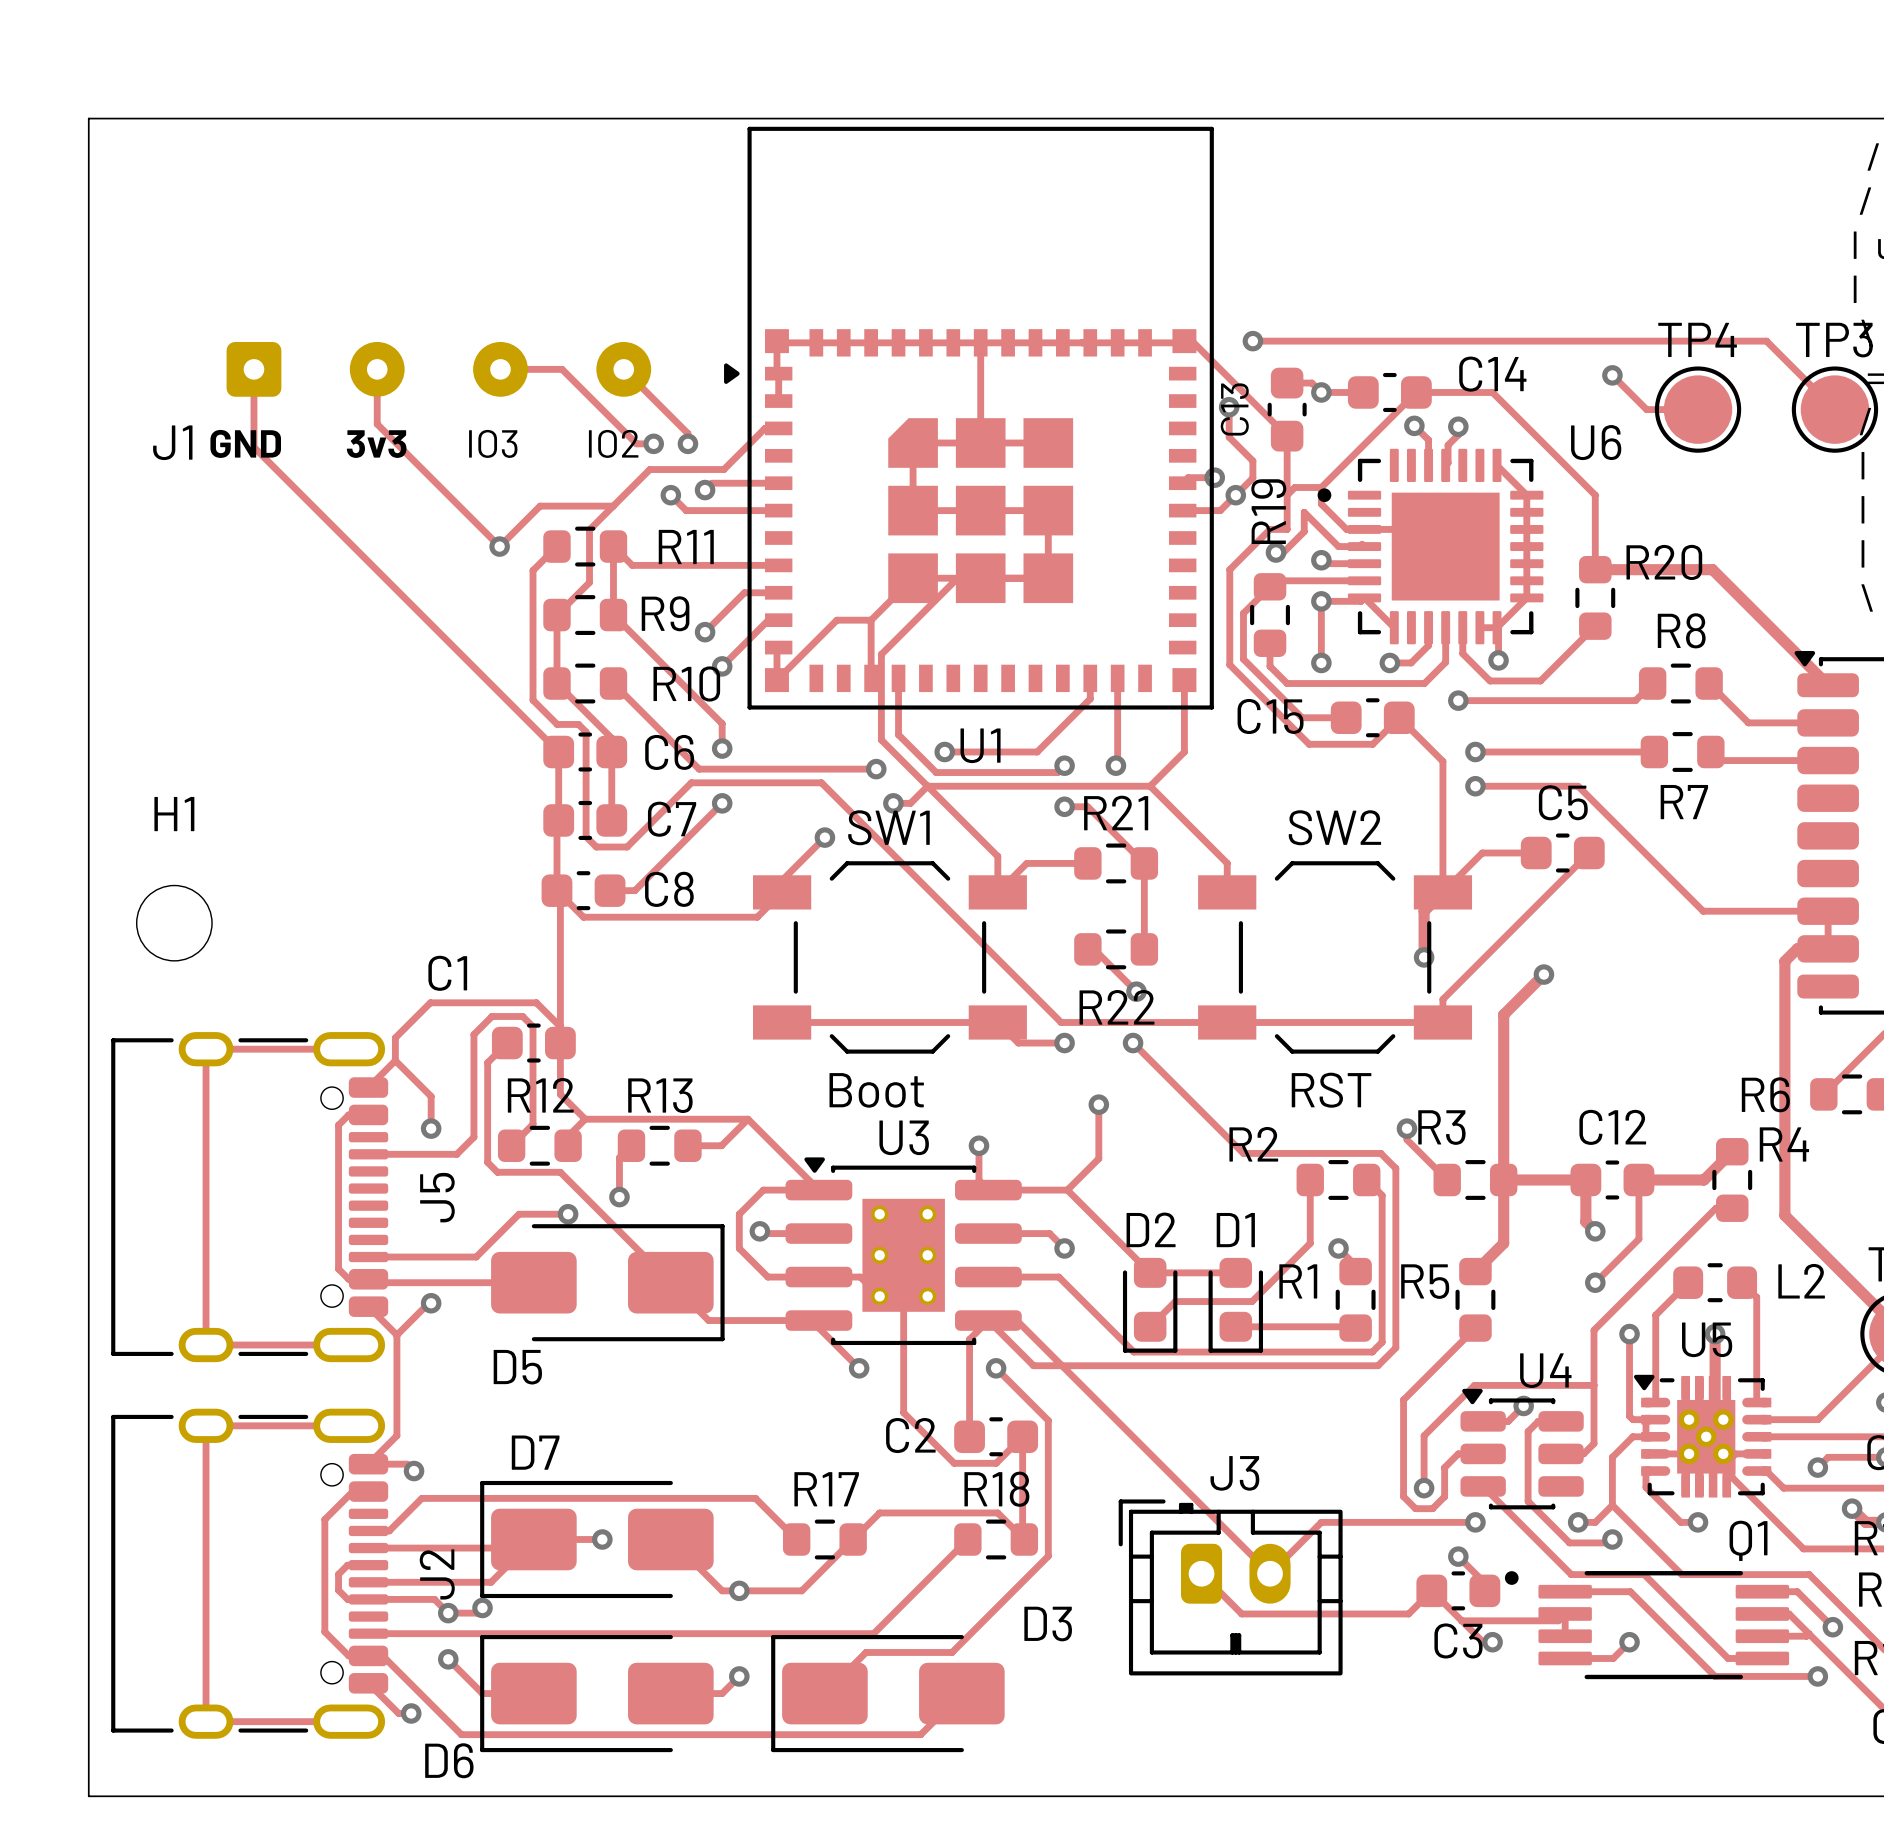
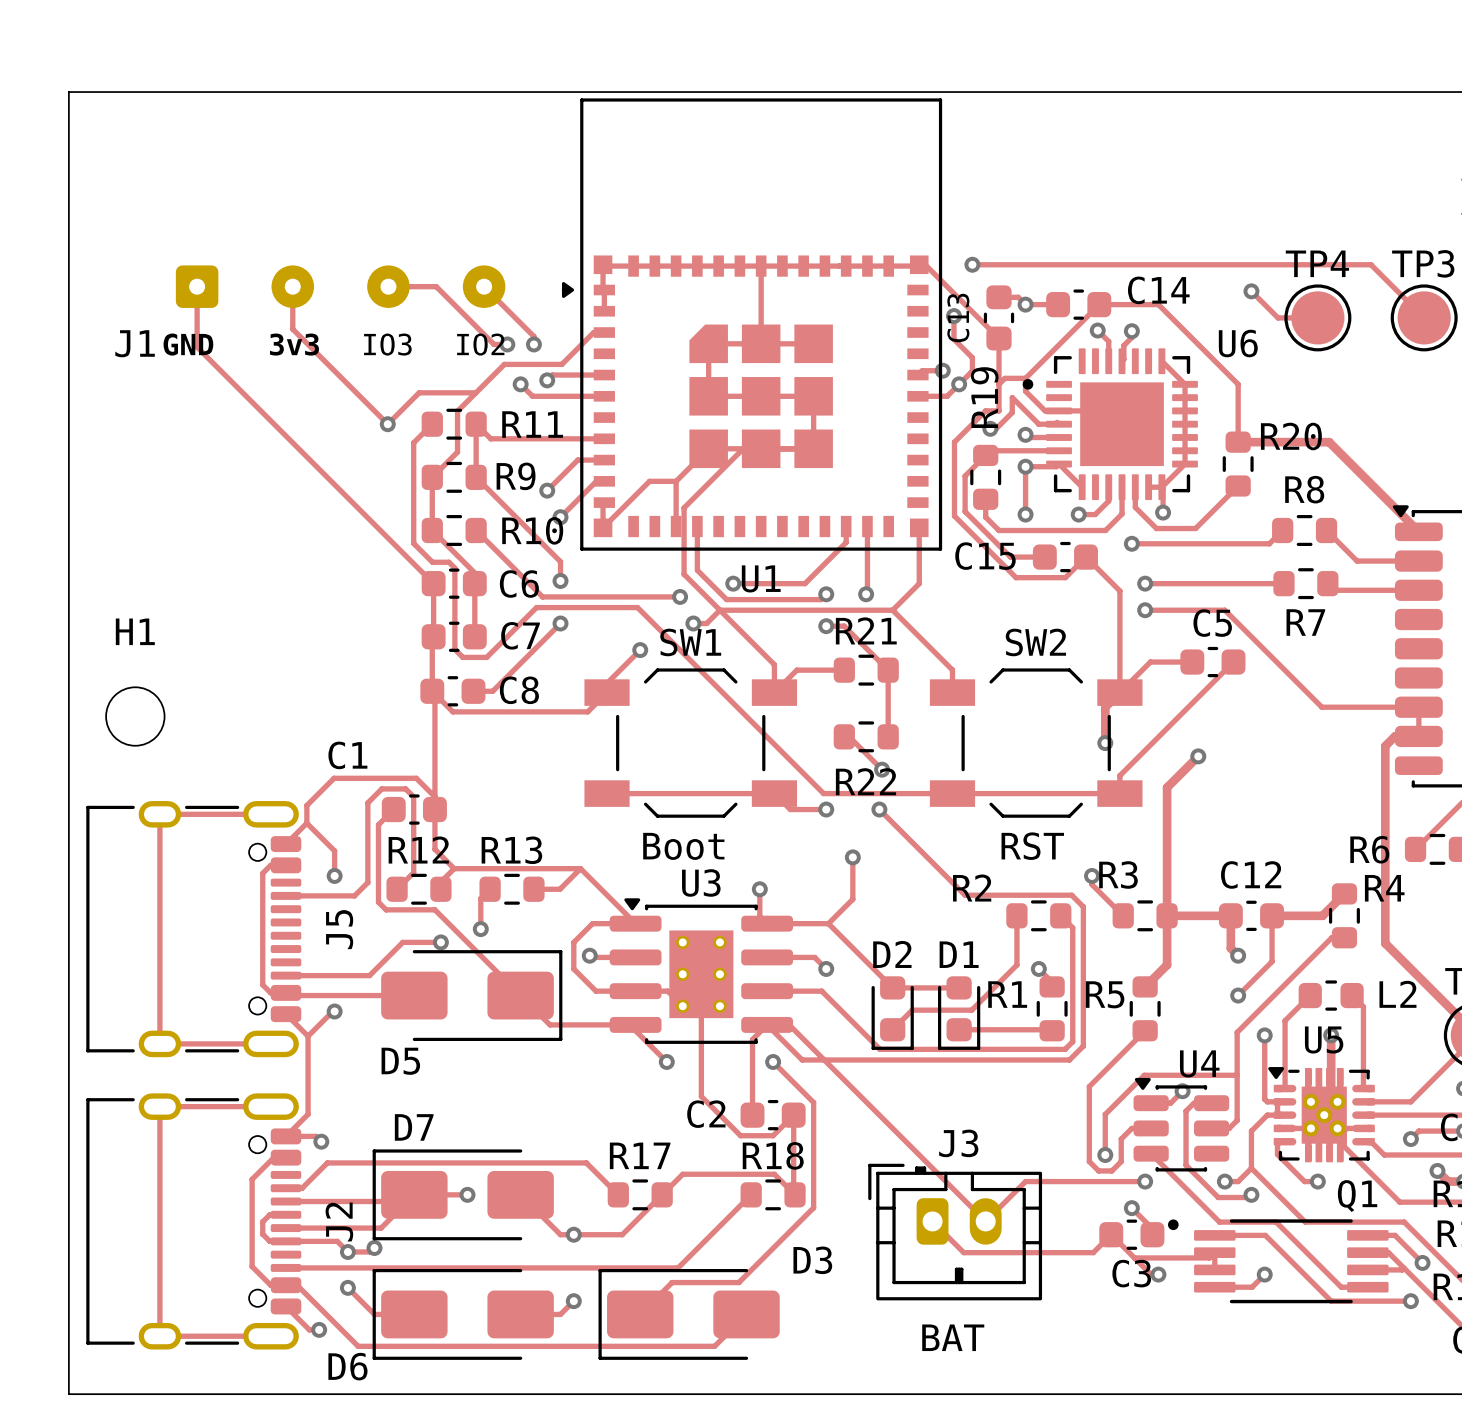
text: none -> BAT (953, 1337)

